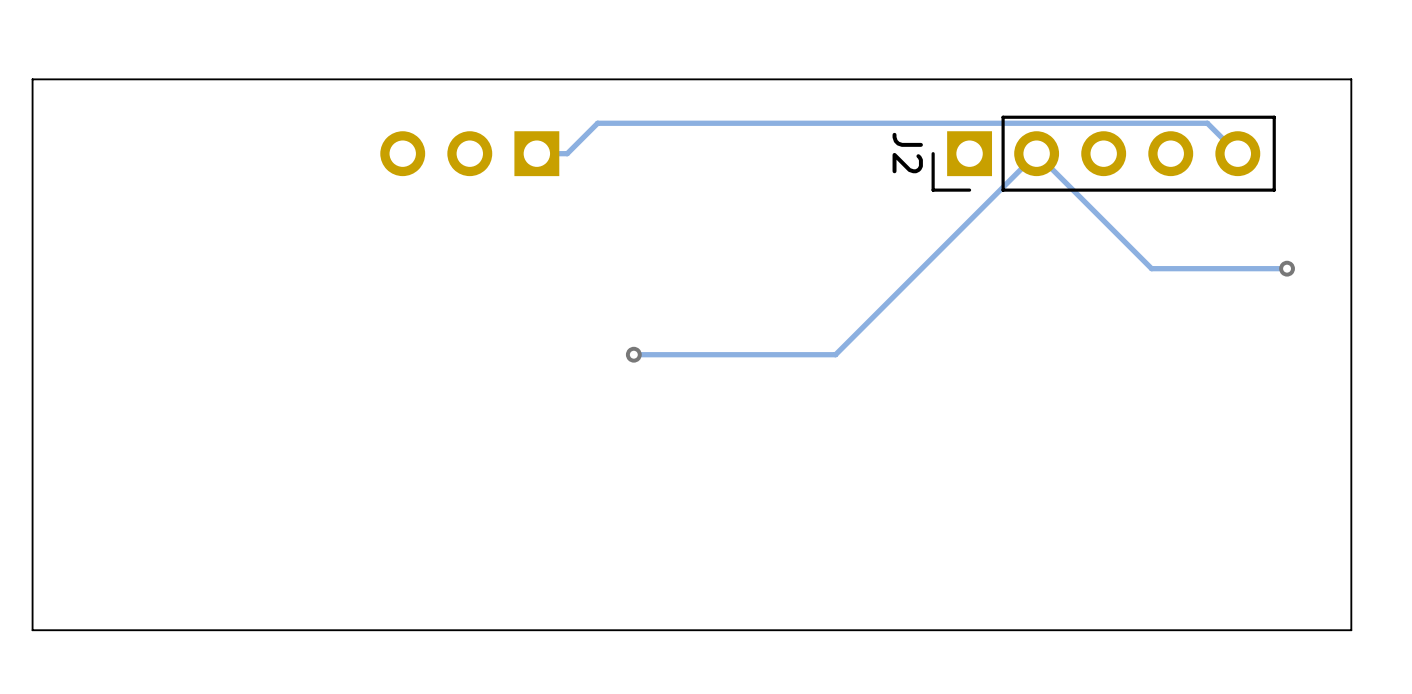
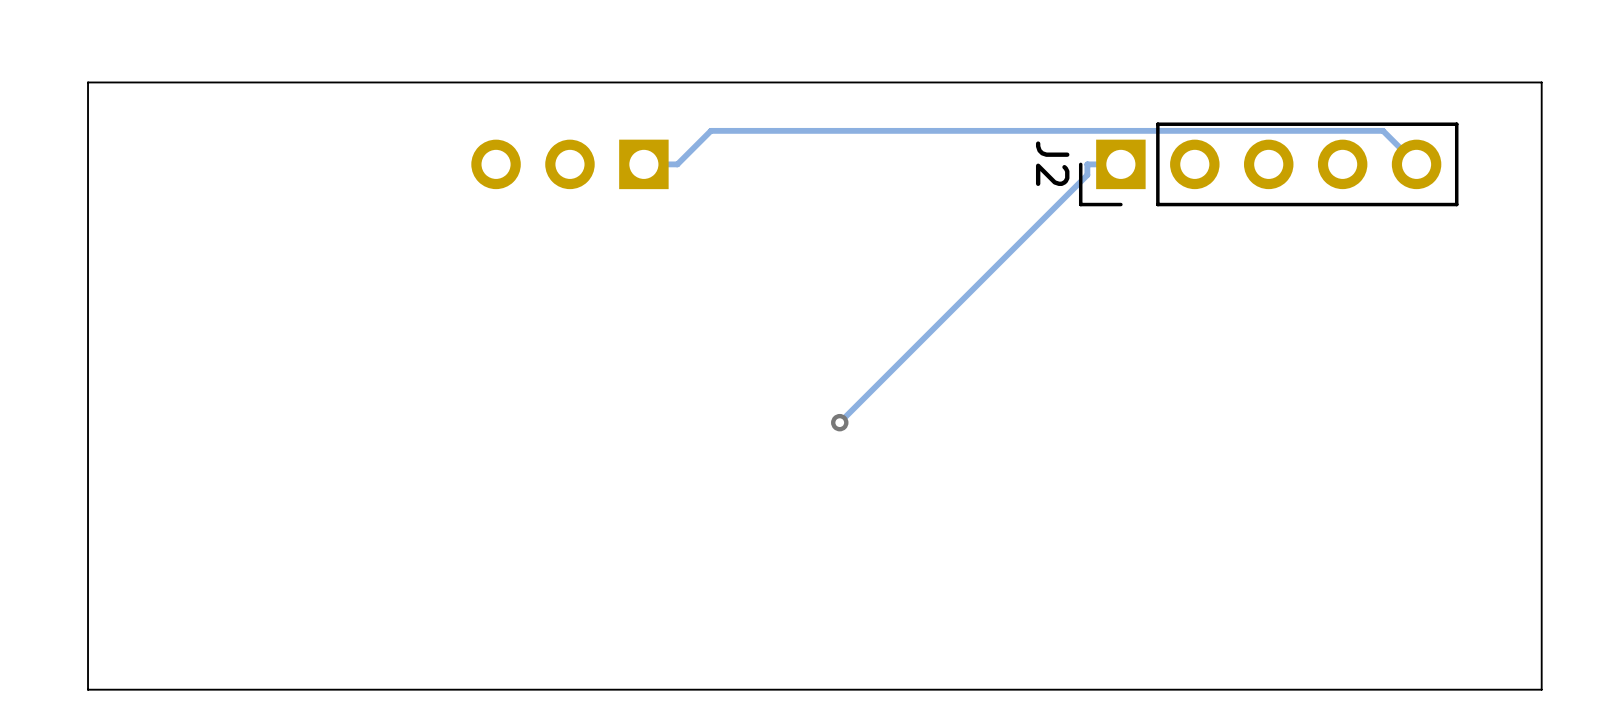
track: none -> (1120, 164) (1087, 164) (1087, 175) (839, 422)
track: (1287, 268) (1151, 268) (1036, 153) (835, 354) (633, 354) -> none
via: (1287, 268) -> none
via position: (633, 354) -> (839, 422)

